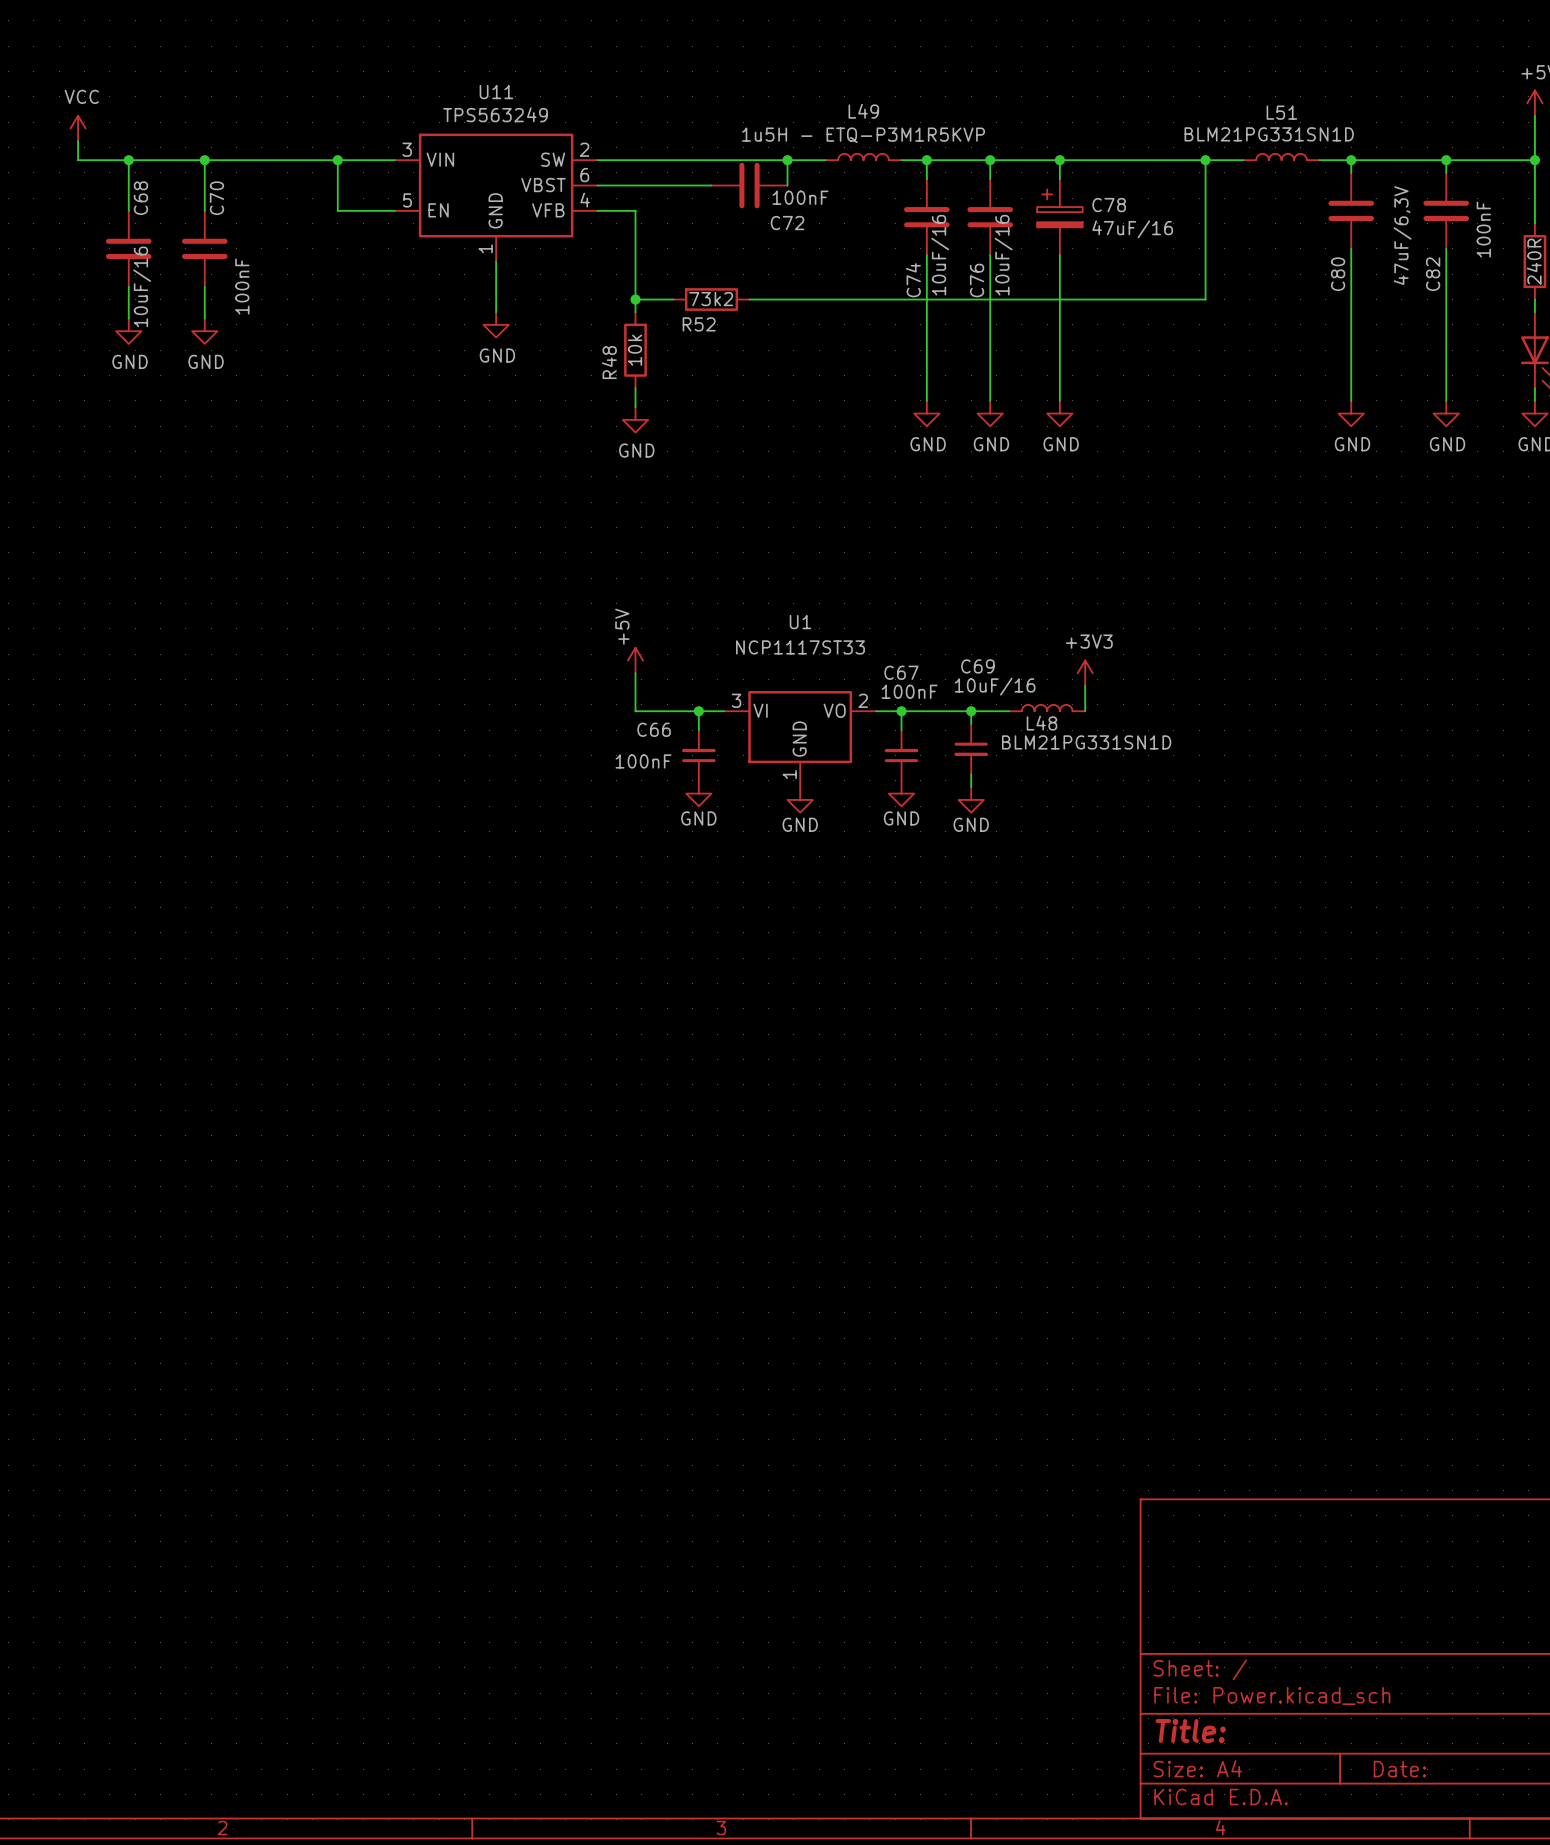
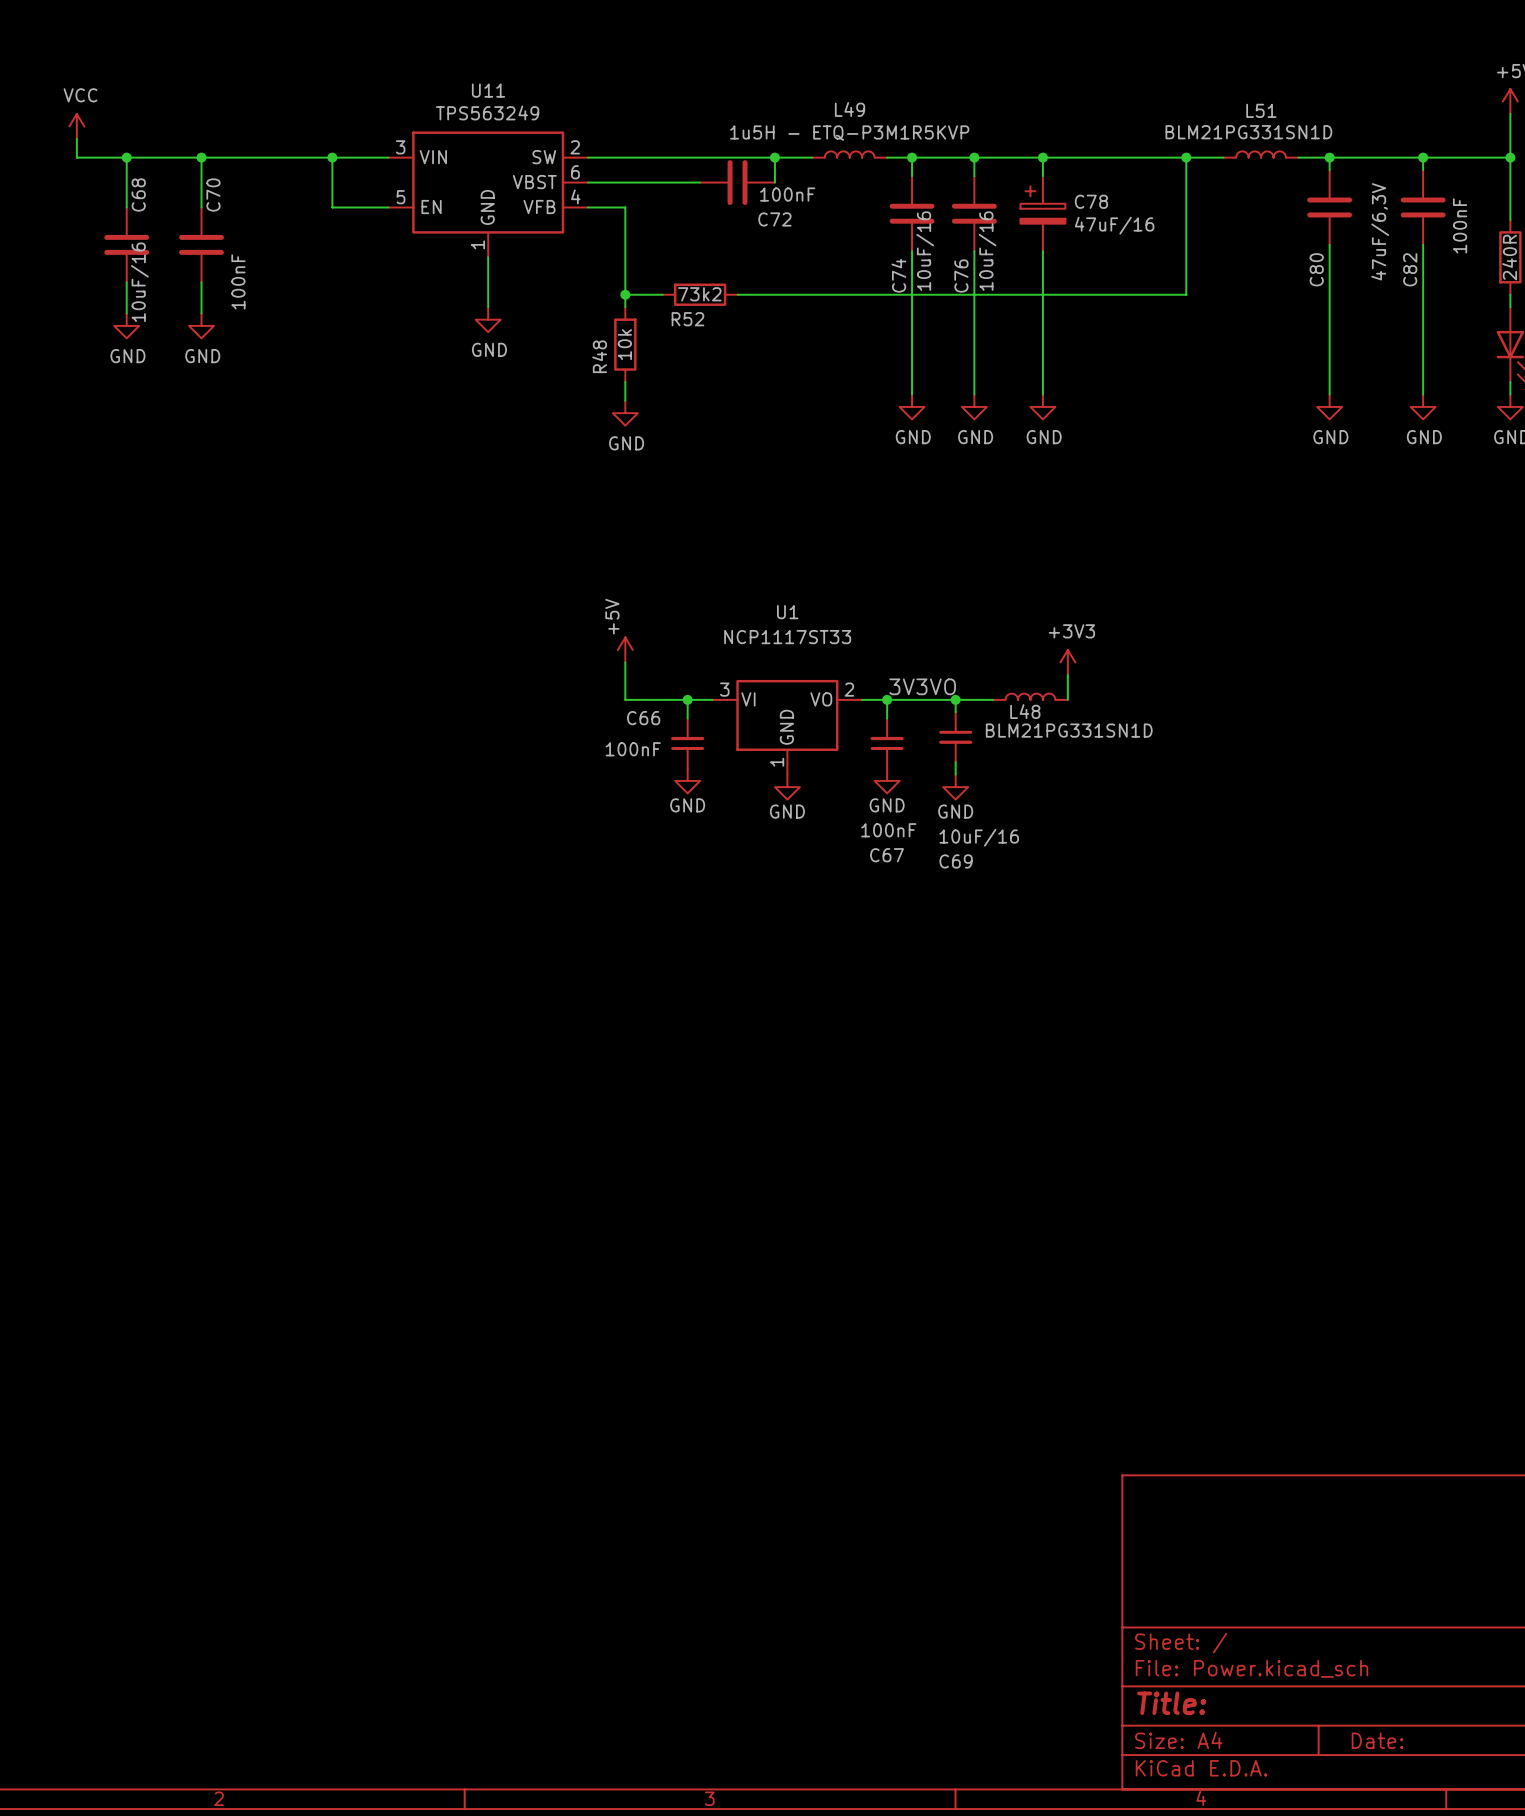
C69 name position: C69 (977, 666) -> C69 (956, 861)
C67 name position: C67 (901, 672) -> C67 (887, 855)
C69 value position: 10uF/16 (995, 686) -> 10uF/16 (979, 837)
C67 value position: 100nF (909, 691) -> 100nF (888, 830)
label: none -> 3V3VO (922, 686)

